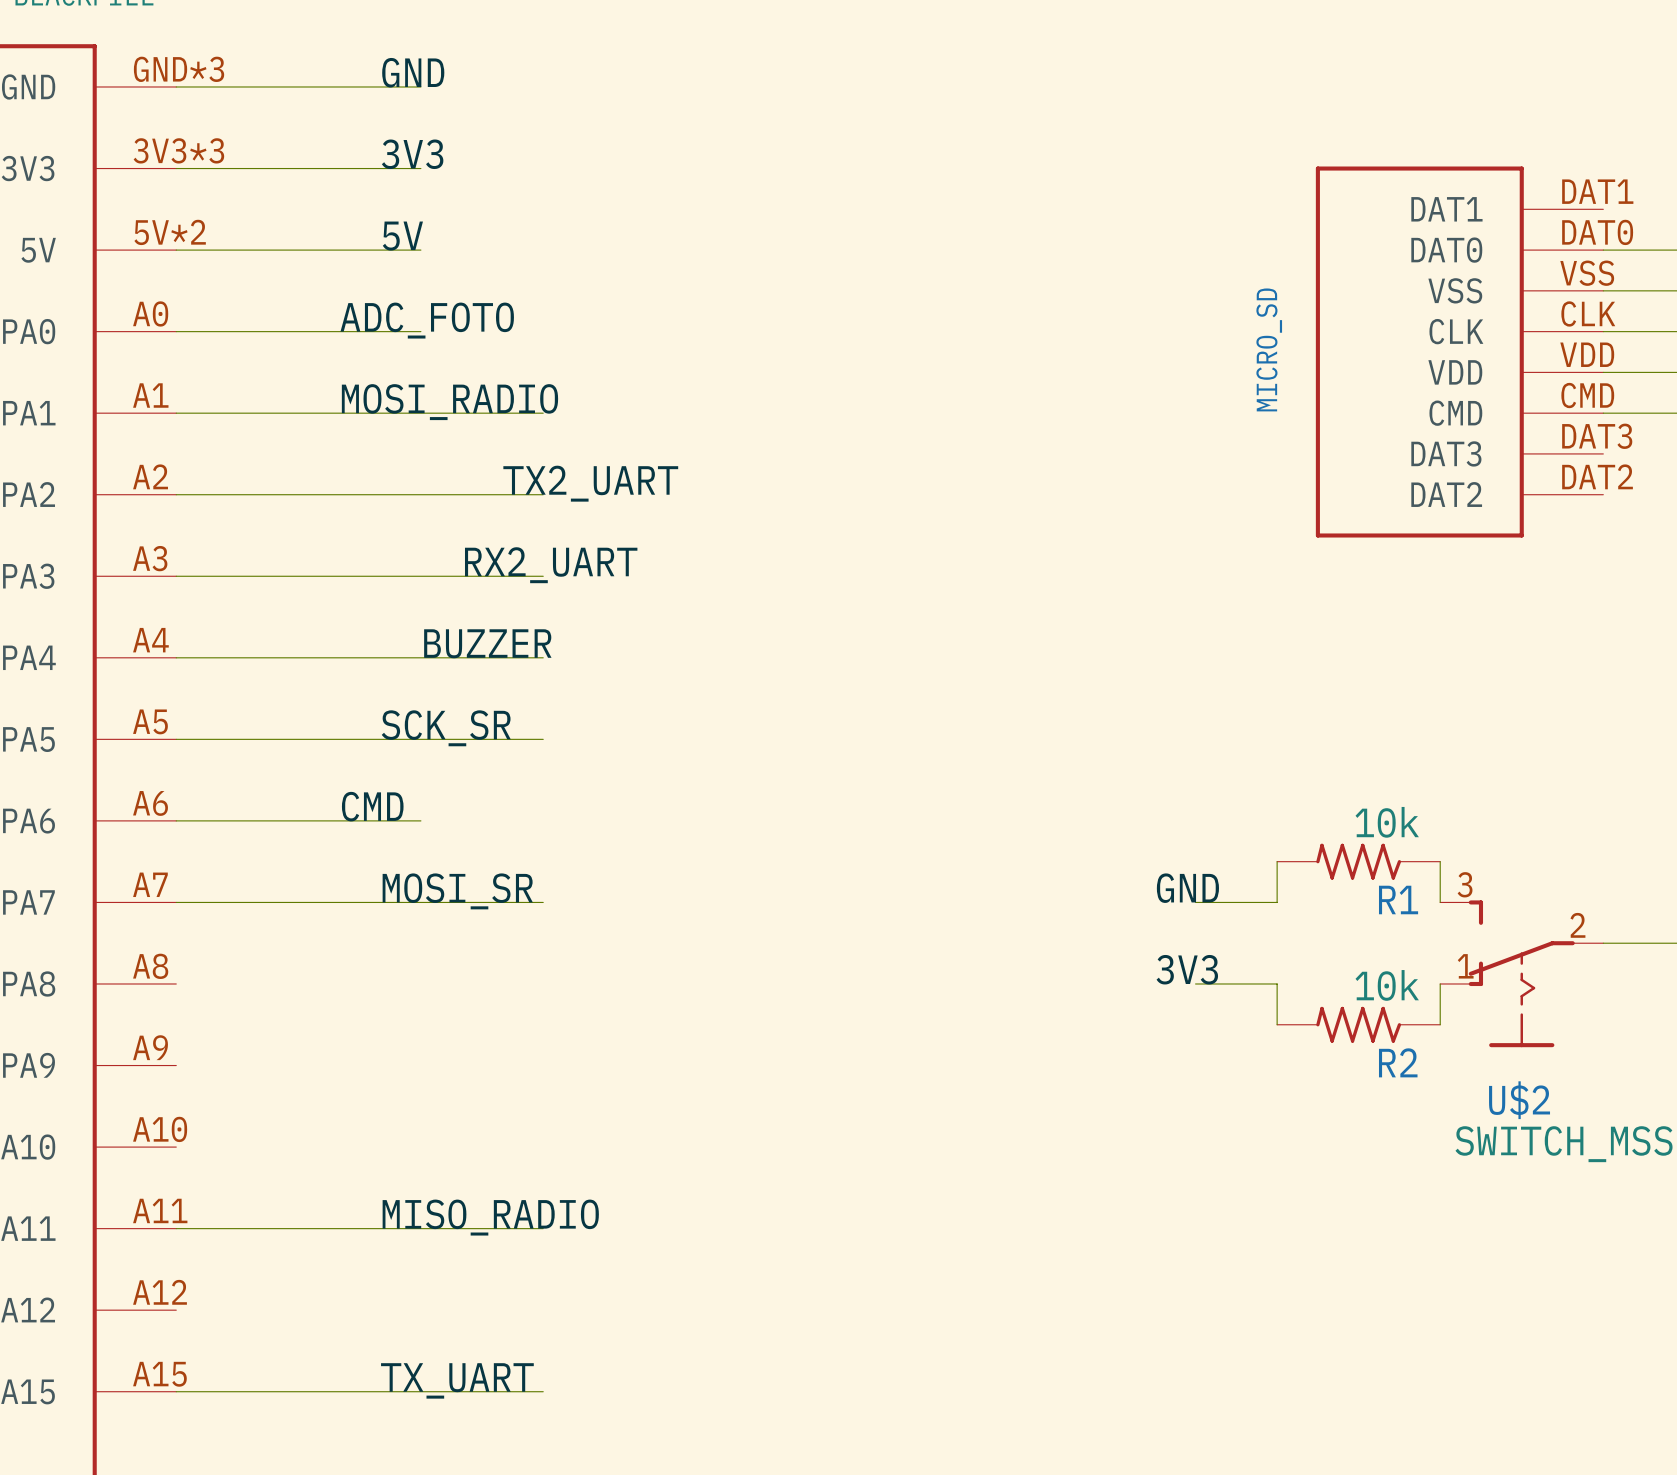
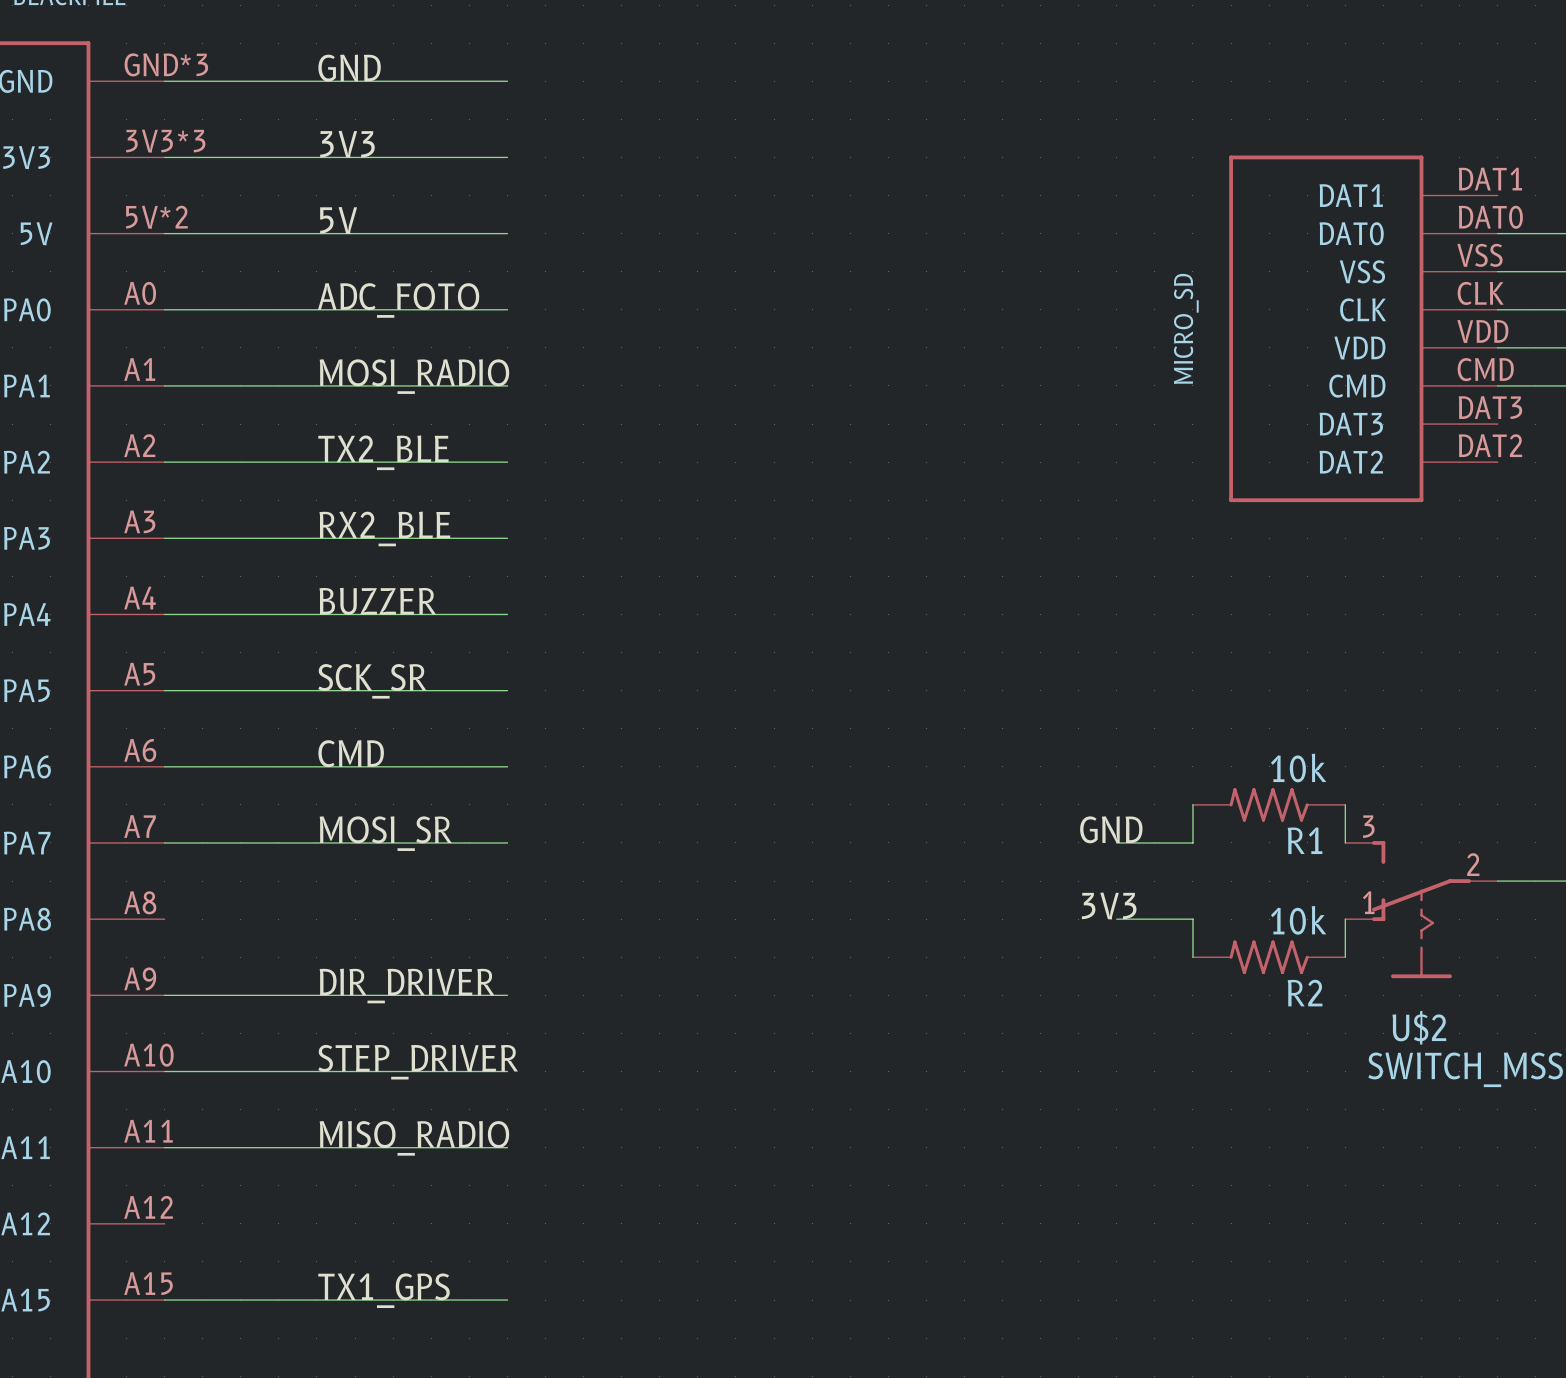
label position: GND (413, 72) -> GND (349, 68)
wire: none -> (393, 81) (507, 81)
label position: 3V3 (412, 154) -> 3V3 (347, 144)
wire: none -> (393, 157) (507, 157)
label position: 5V (402, 236) -> 5V (338, 220)
wire: none -> (393, 233) (507, 233)
wire: none -> (393, 309) (507, 309)
label: none -> TX2_BLE (383, 452)
label: TX2_UART (590, 483) -> none
label: none -> RX2_BLE (384, 528)
label: RX2_UART (551, 565) -> none
label position: BUZZER (487, 643) -> BUZZER (377, 601)
label position: SCK_SR (446, 728) -> SCK_SR (372, 681)
wire: none -> (393, 766) (507, 766)
label position: MOSI_SR (457, 891) -> MOSI_SR (385, 833)
label: none -> DIR_DRIVER (407, 985)
wire: none -> (164, 995) (507, 995)
label: none -> STEP_DRIVER (418, 1062)
wire: none -> (164, 1071) (507, 1071)
label position: MISO_RADIO (490, 1217) -> MISO_RADIO (414, 1138)
label: none -> TX1_GPS (384, 1290)
label: TX_UART (457, 1380) -> none

